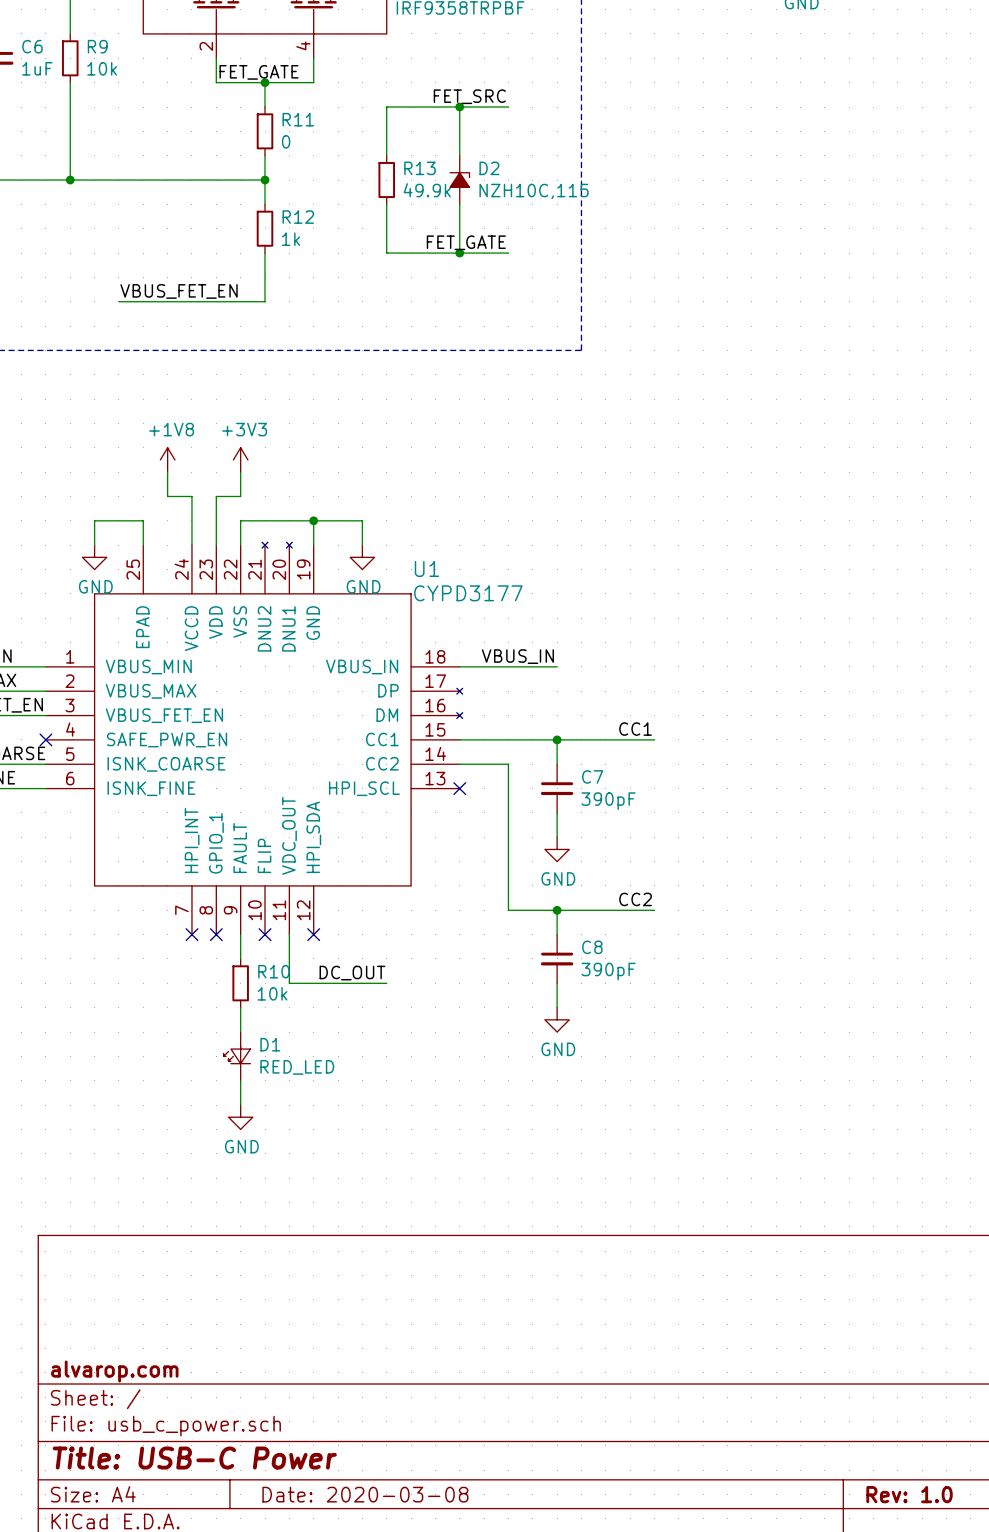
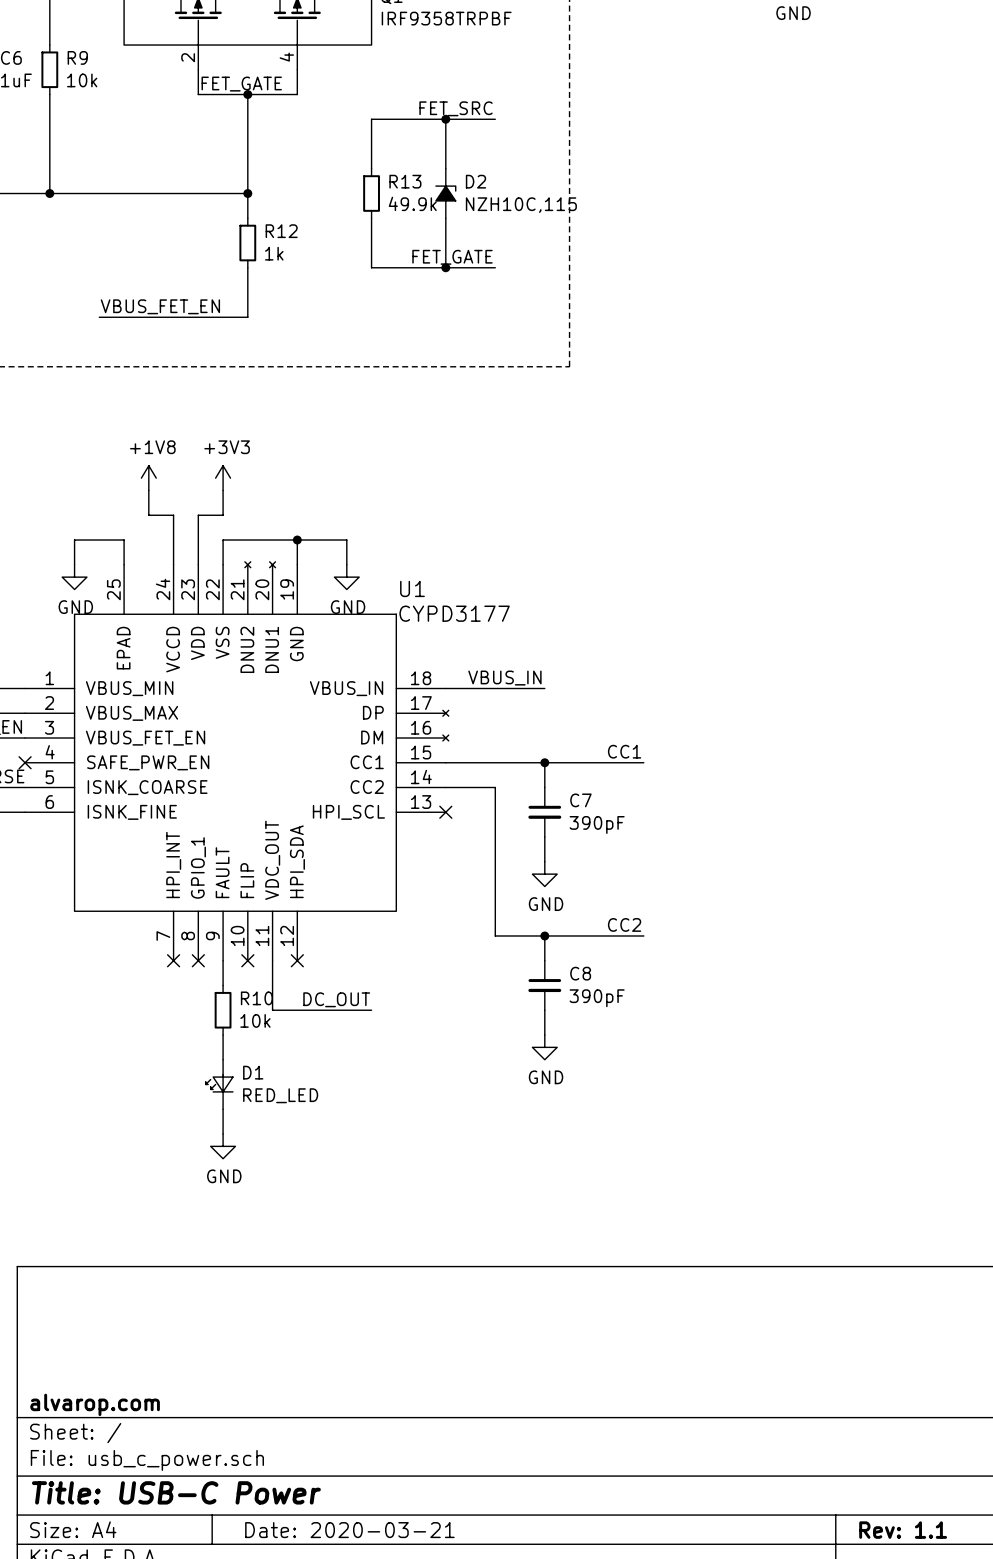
wire: none -> (247, 119) (247, 168)
R11: 0 (265, 131) -> none
title block: Date: 2020-03-08 (365, 1494) -> Date: 2020-03-21 (349, 1530)
title block: Rev: 1.0 (909, 1494) -> Rev: 1.1 (903, 1530)

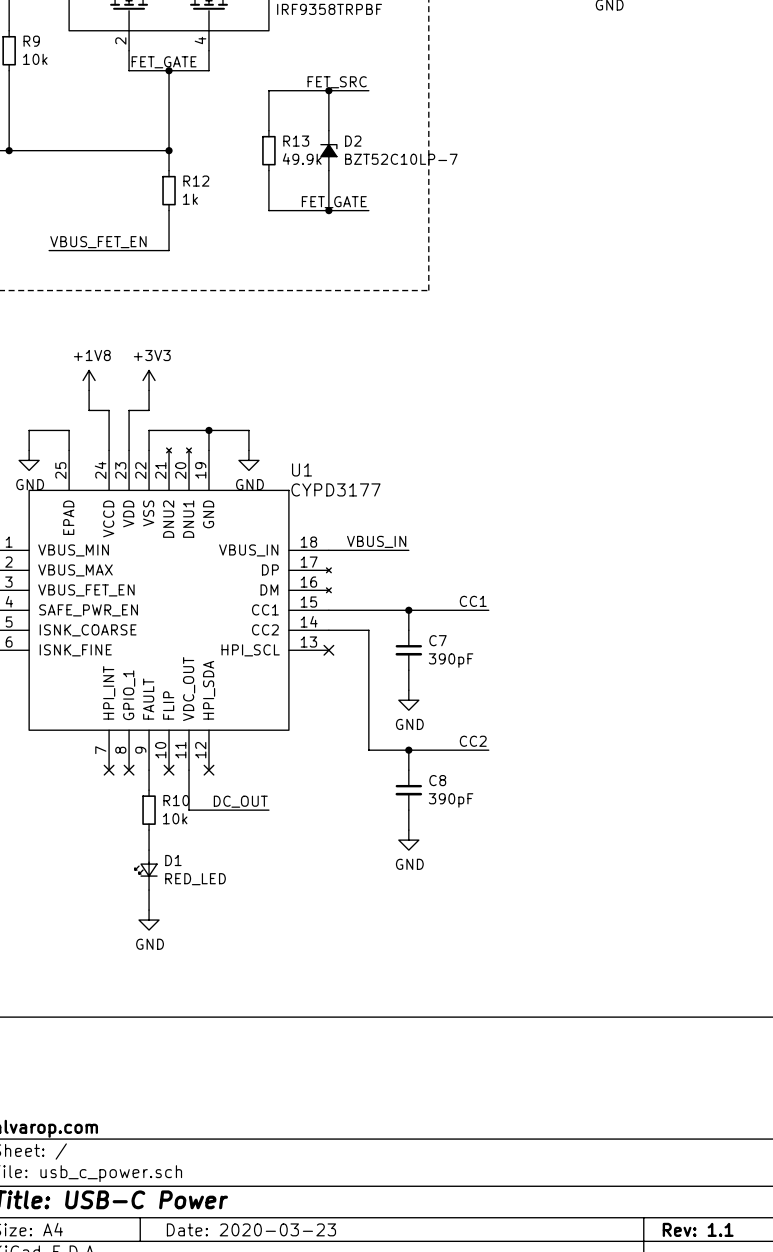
D2 value: NZH10C,115 (521, 205) -> BZT52C10LP-7 (401, 159)
title block: Date: 2020-03-21 (349, 1530) -> Date: 2020-03-23 (251, 1229)

